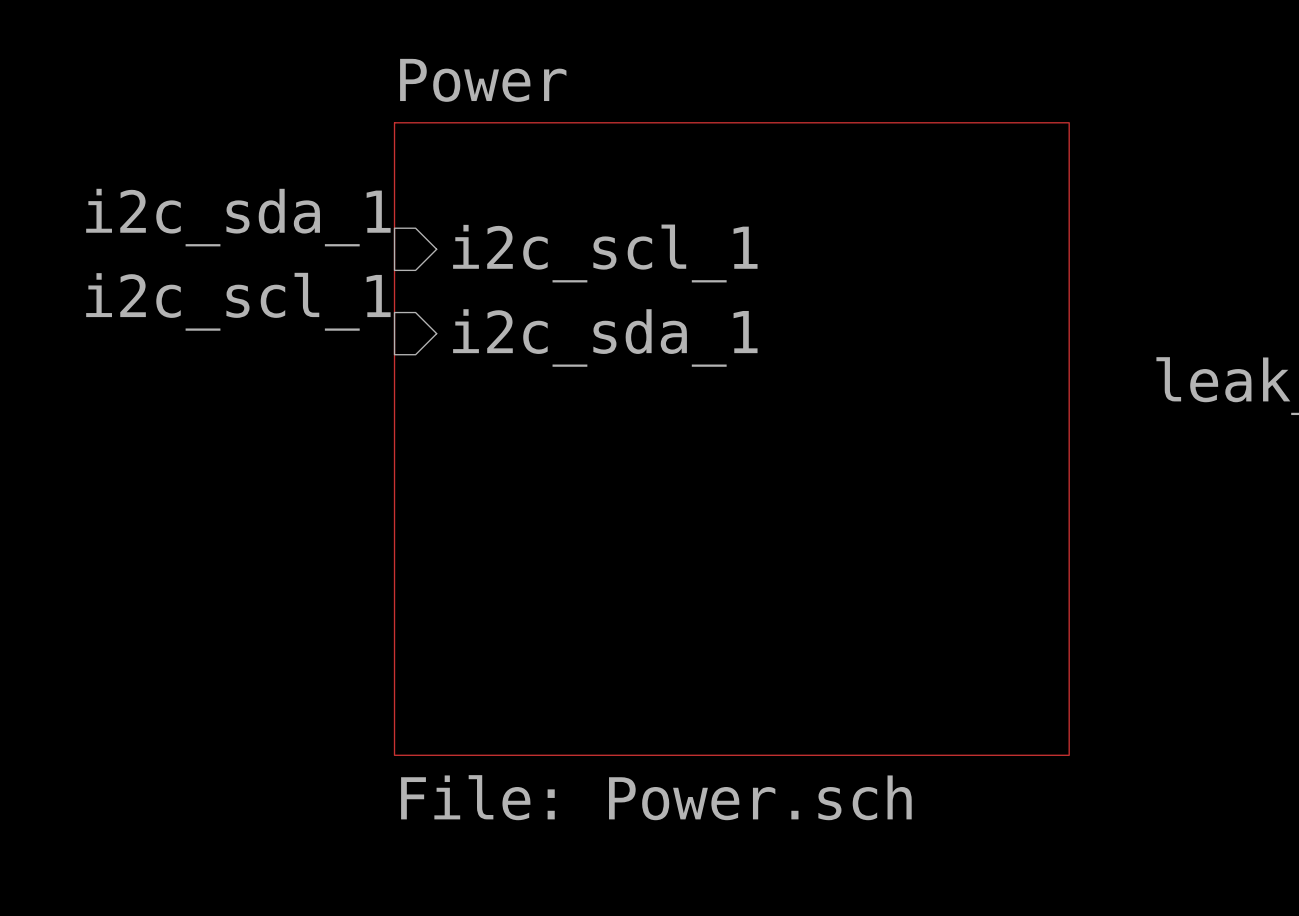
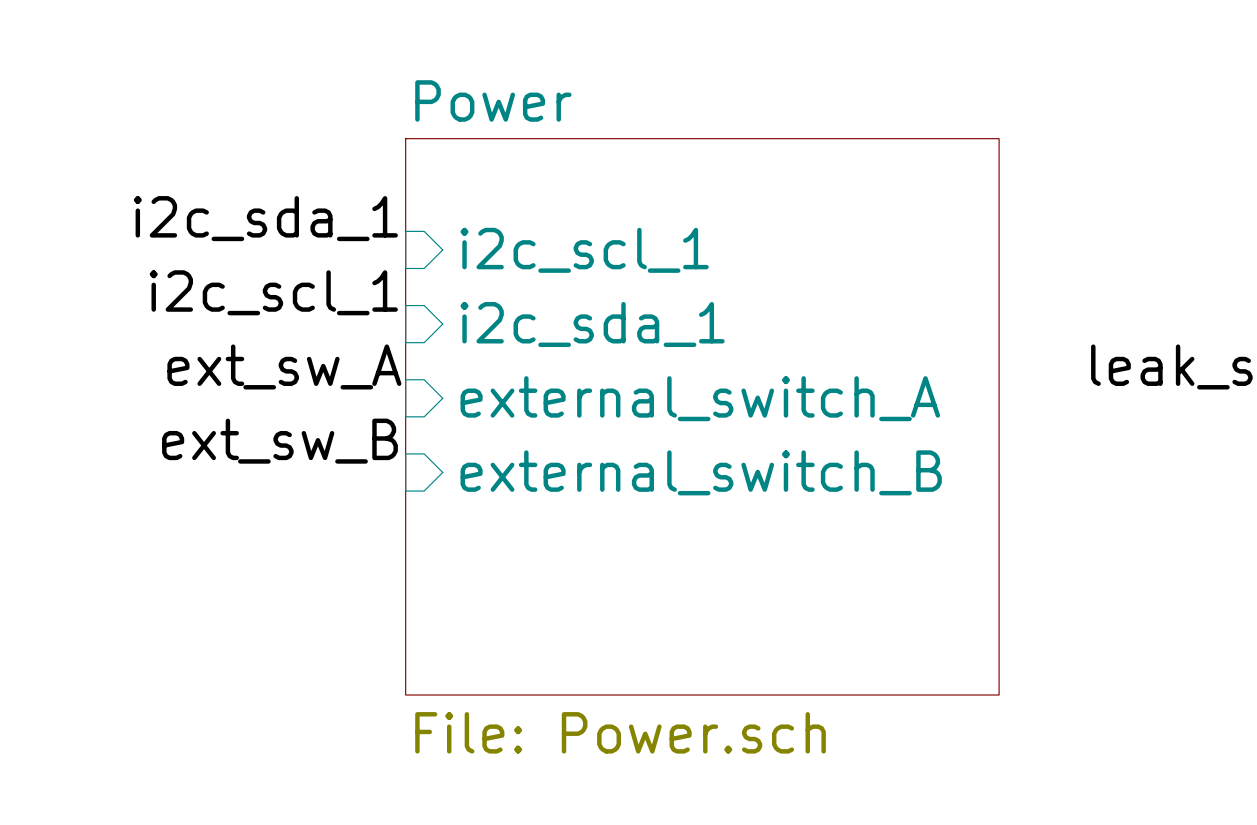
label: none -> ext_sw_A (284, 366)
sheet pin: none -> external_switch_A (700, 398)
label: none -> ext_sw_B (279, 441)
sheet pin: none -> external_switch_B (701, 472)

